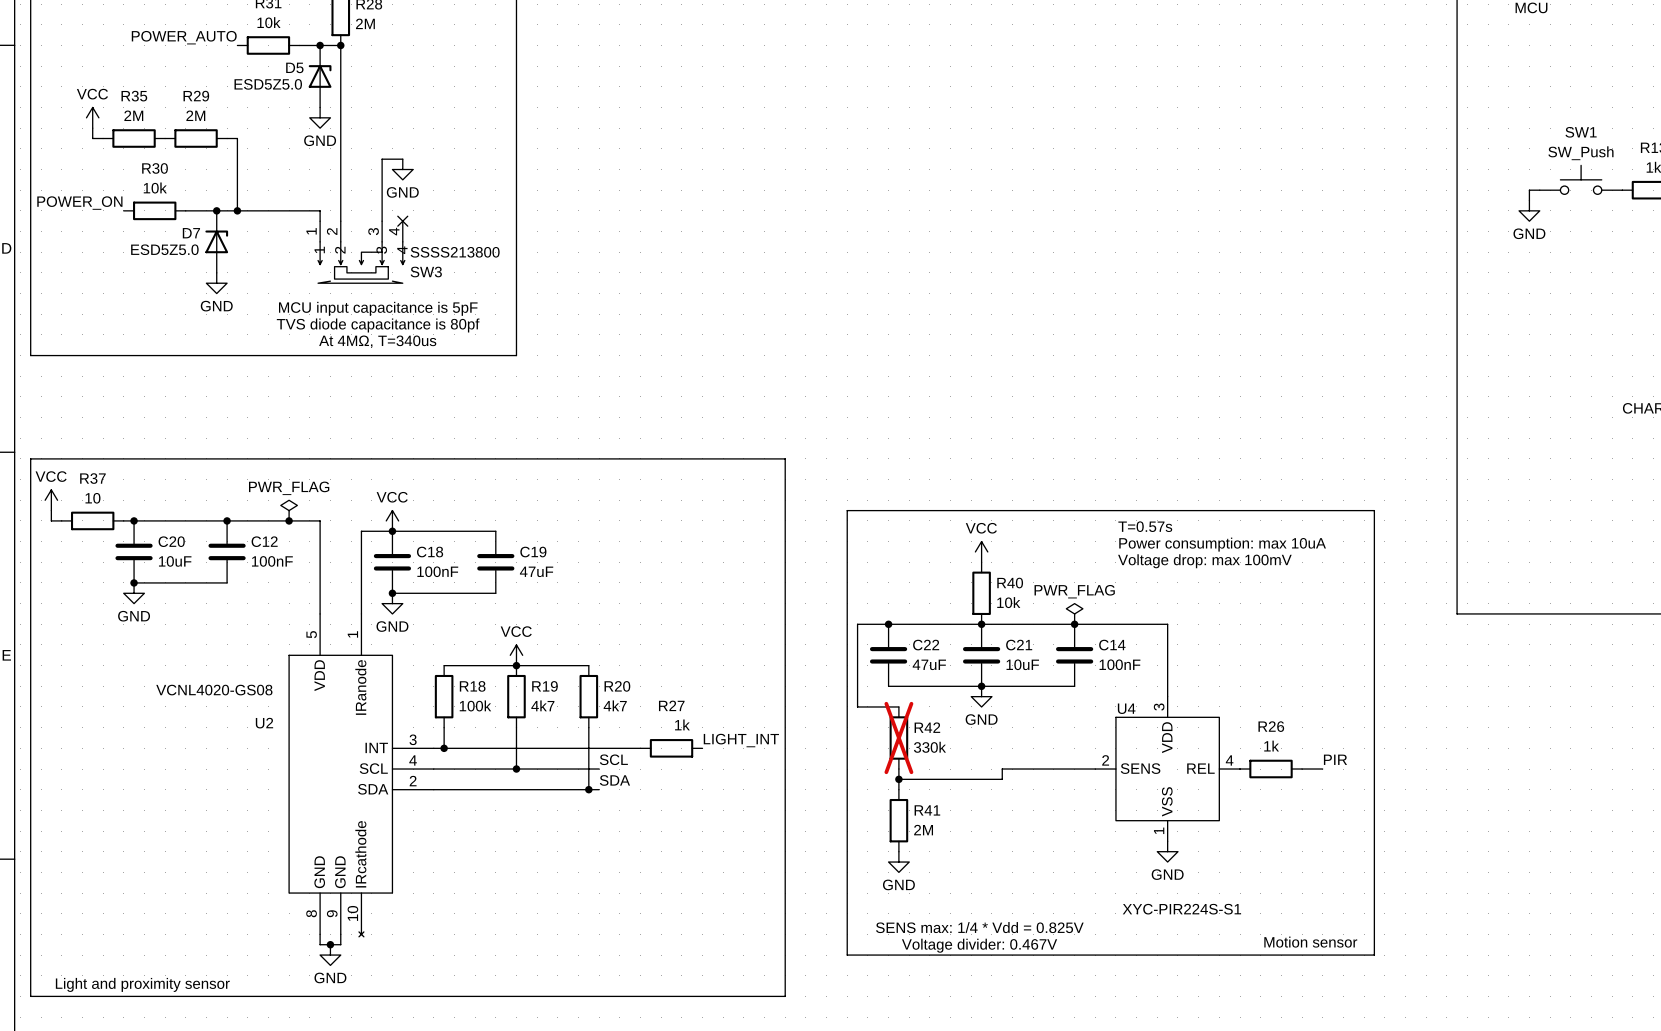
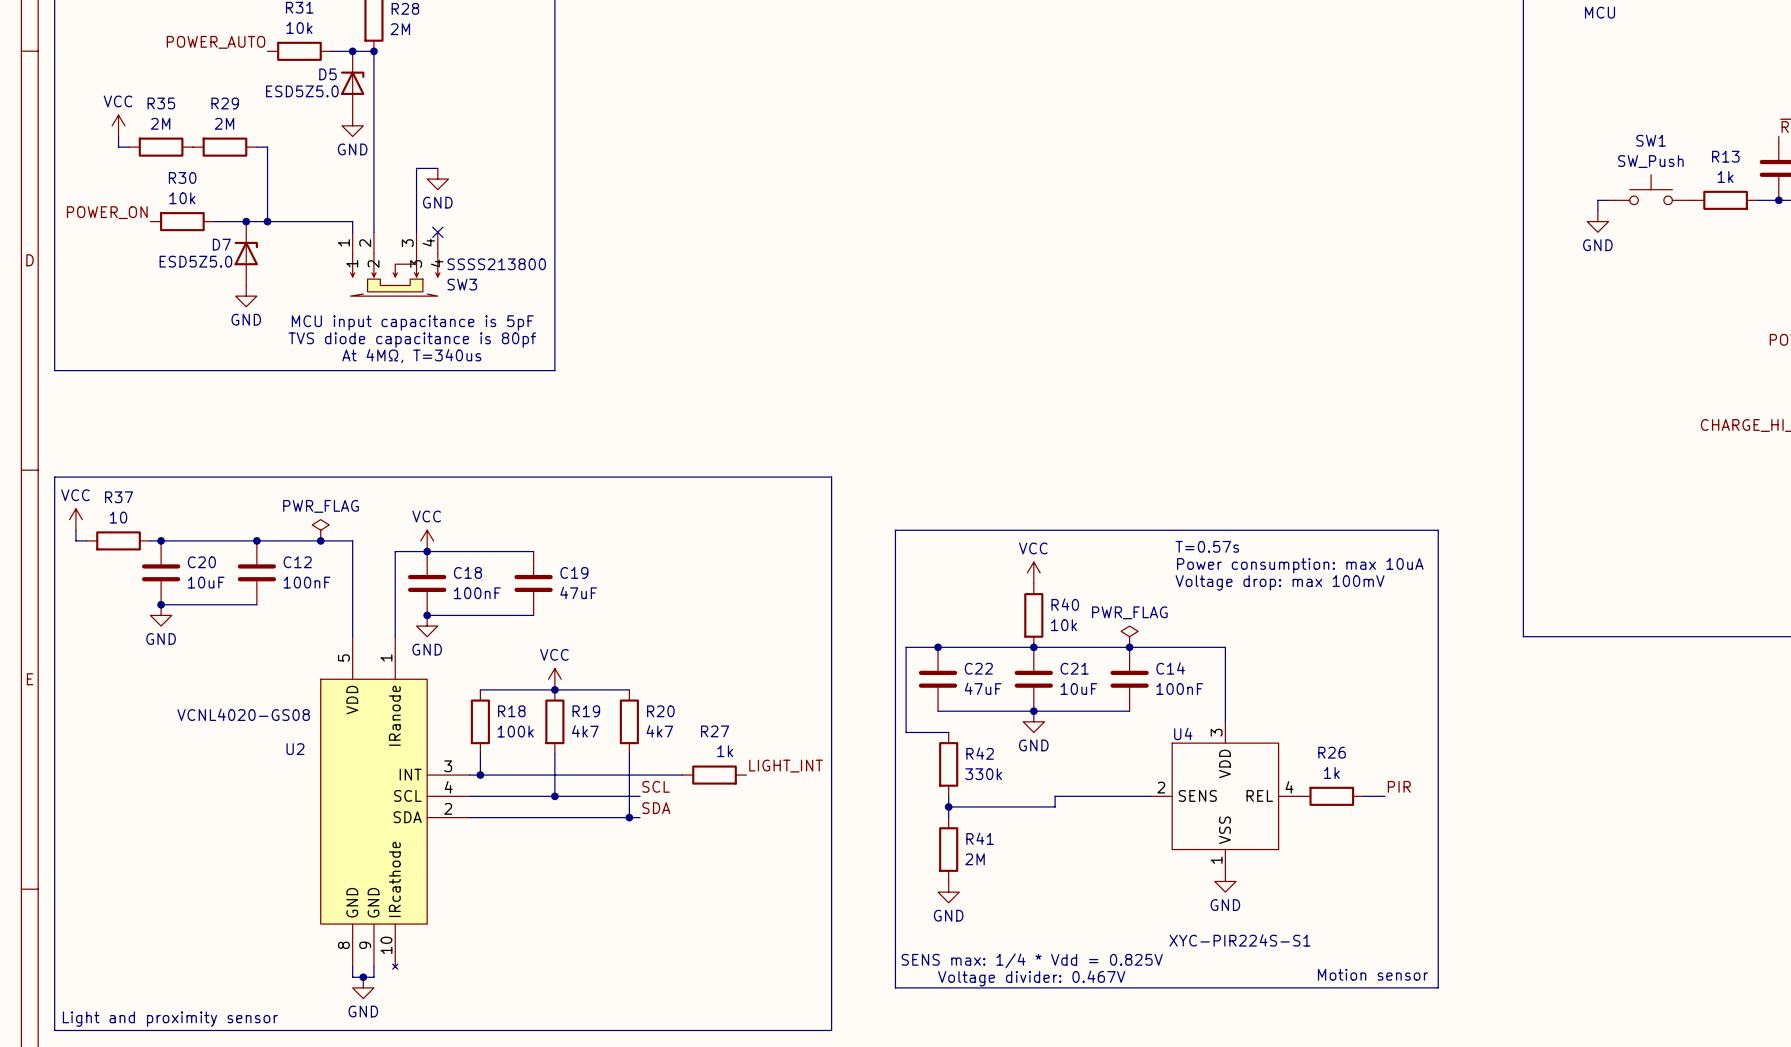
R42 do-not-place cross: (898, 737) -> none

